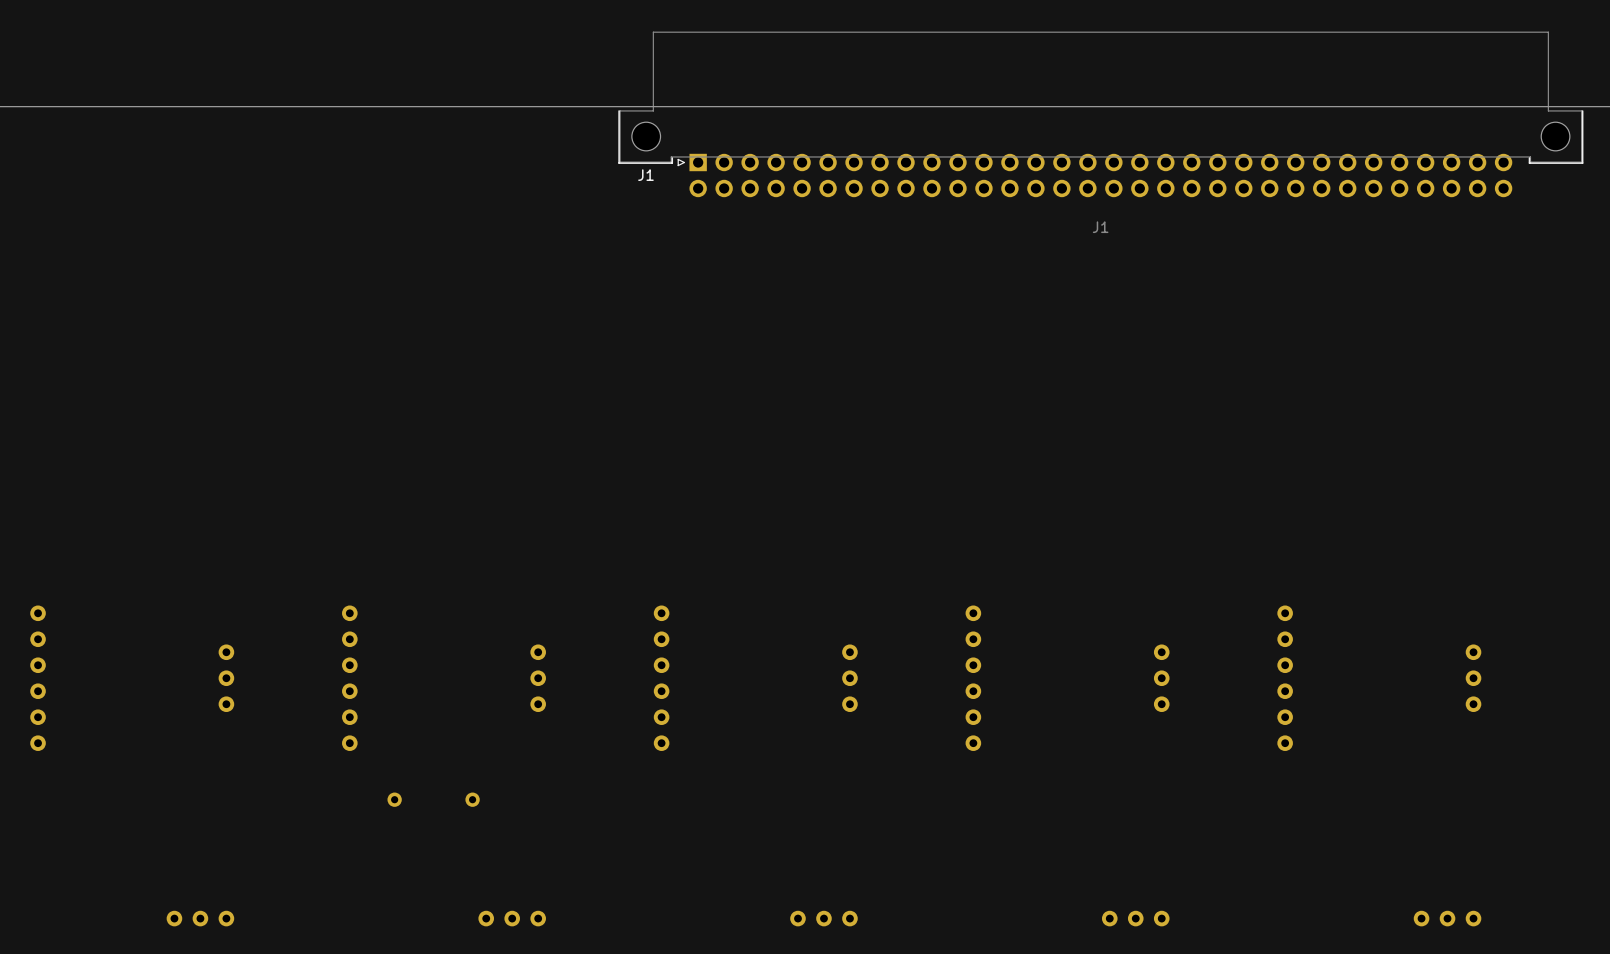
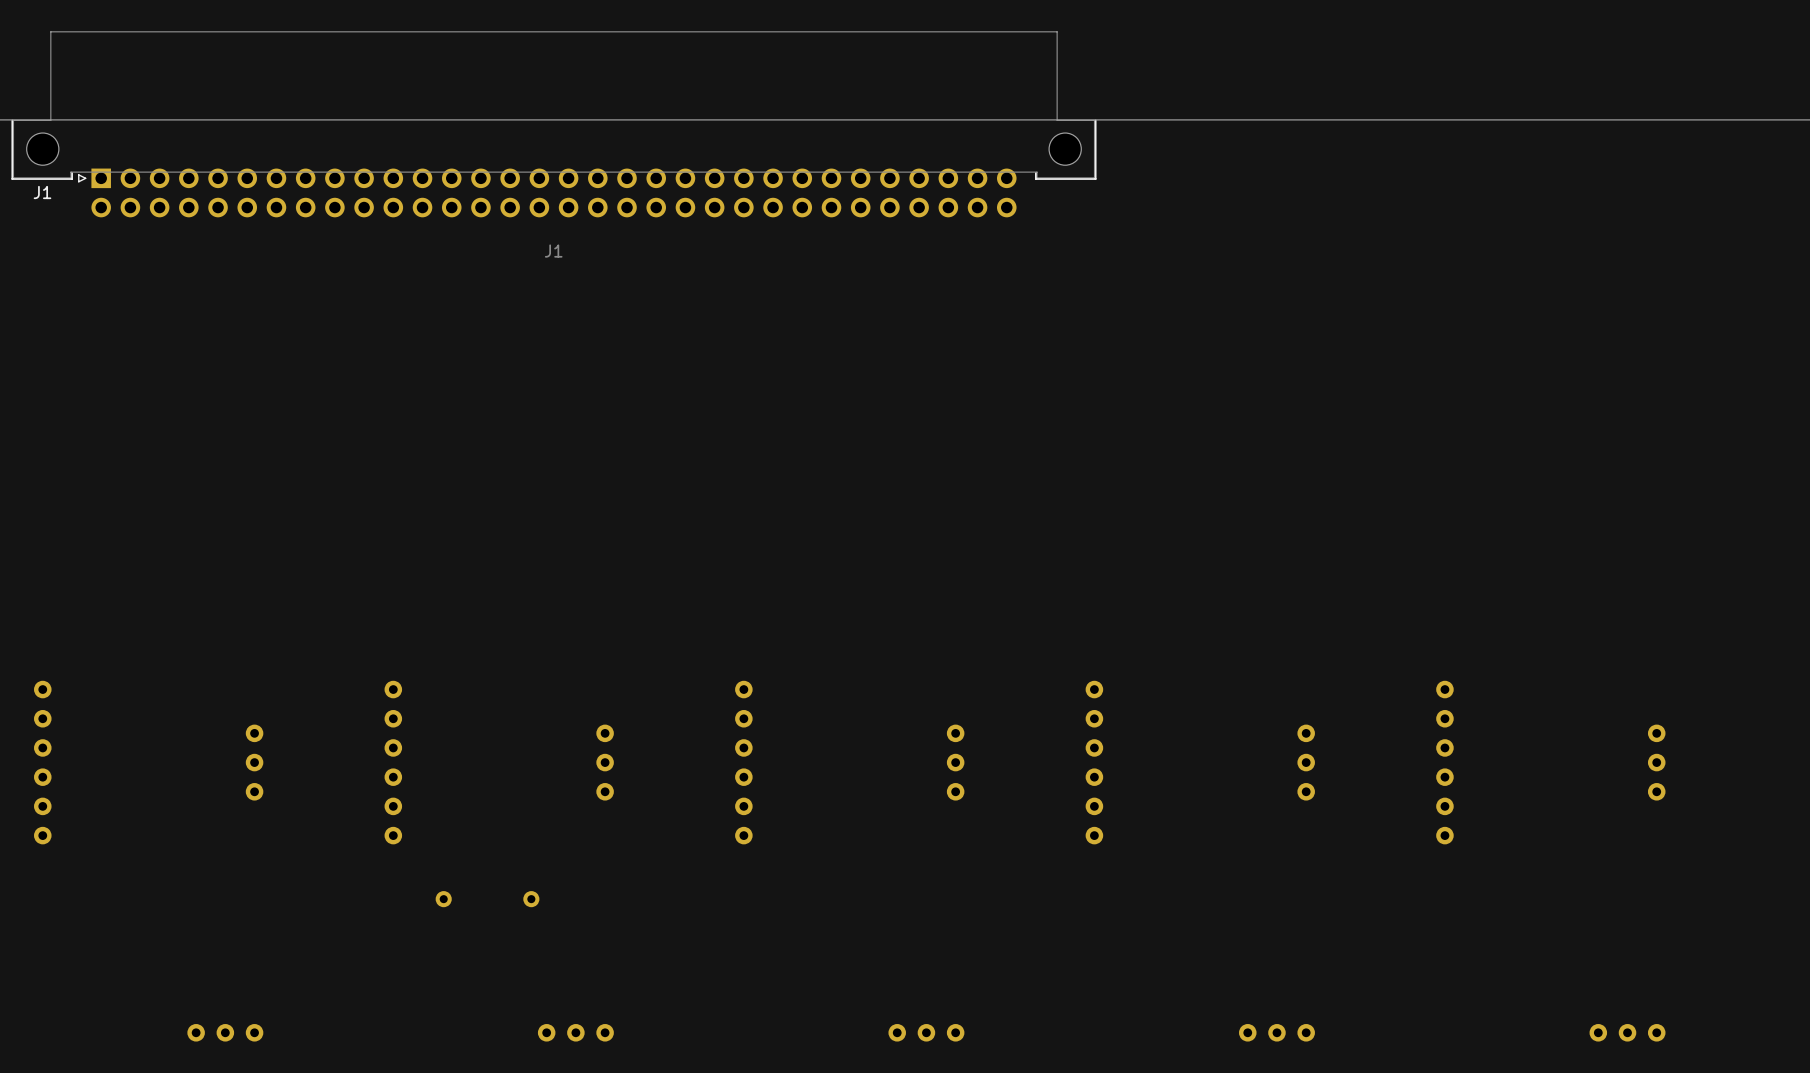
J1 position: (1100, 114) -> (553, 124)

